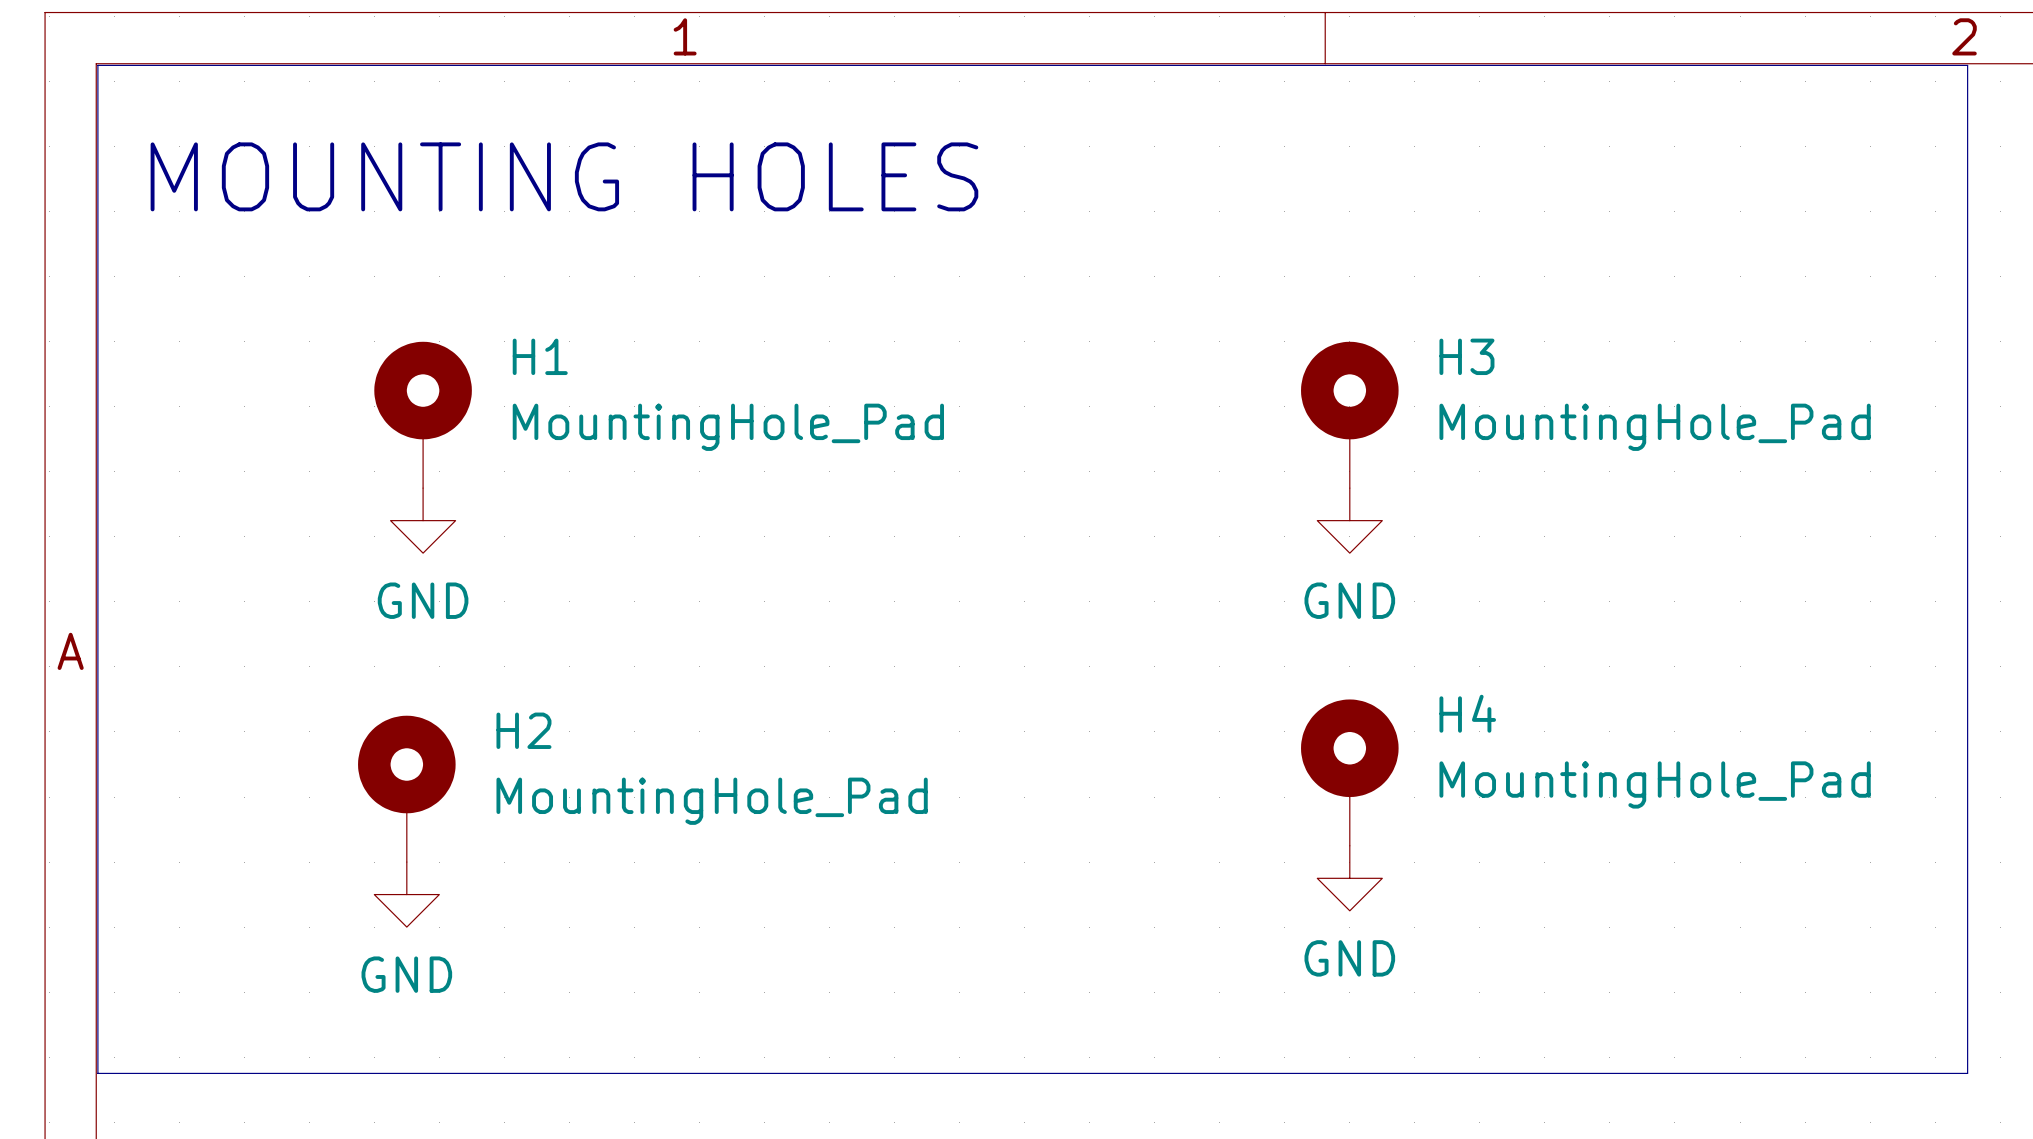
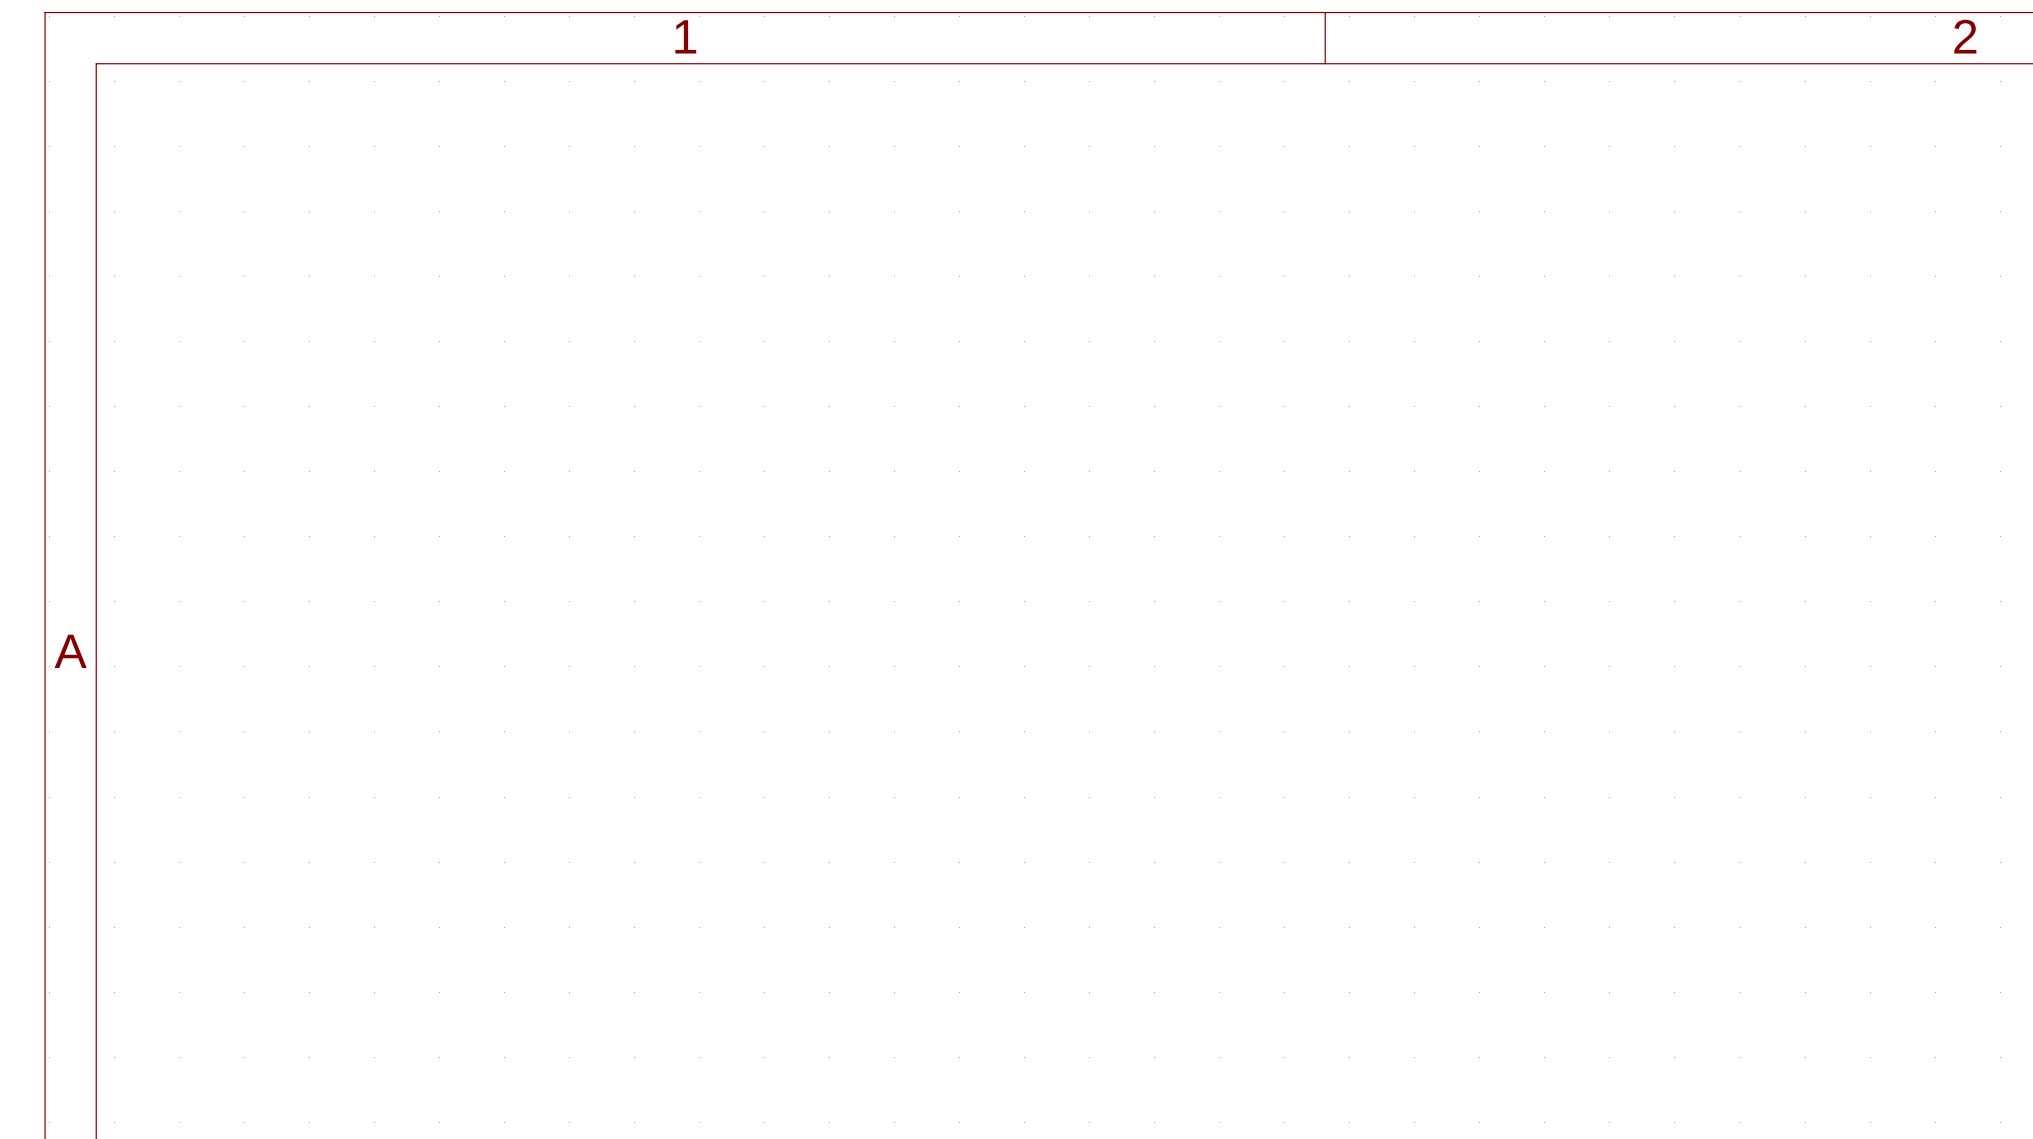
line: (97, 65) (1967, 65) (1967, 1073) (97, 1073) (97, 65) -> none
text: MOUNTING HOLES (564, 176) -> none
H1: MountingHole_Pad (423, 414) -> none
H3: MountingHole_Pad (1349, 414) -> none
power symbol: GND (423, 520) -> none
power symbol: GND (1349, 520) -> none
H4: MountingHole_Pad (1349, 772) -> none
H2: MountingHole_Pad (406, 788) -> none
power symbol: GND (1349, 878) -> none
power symbol: GND (406, 894) -> none

